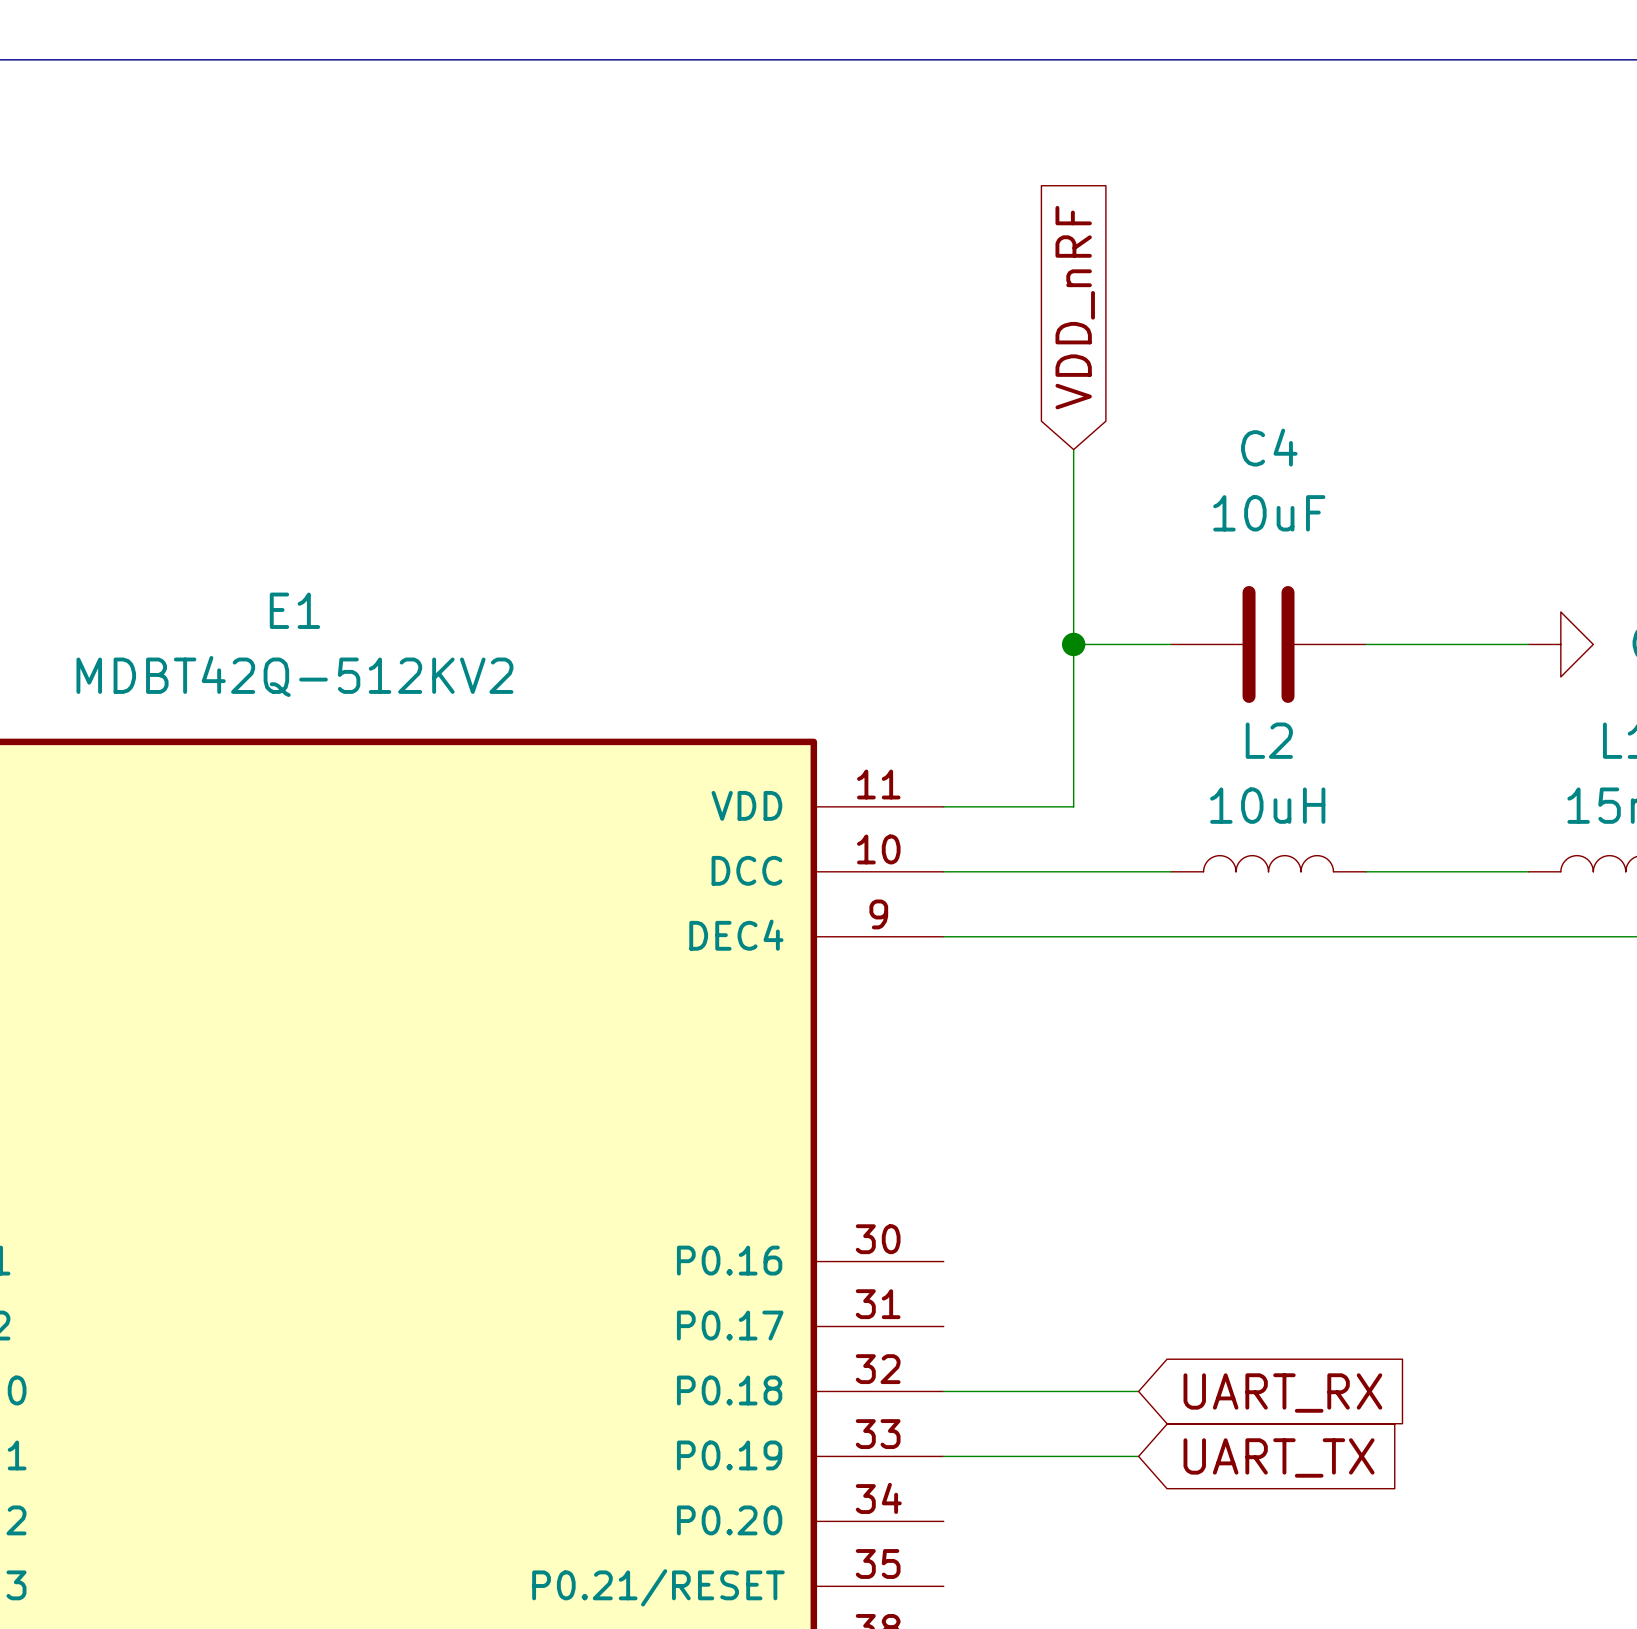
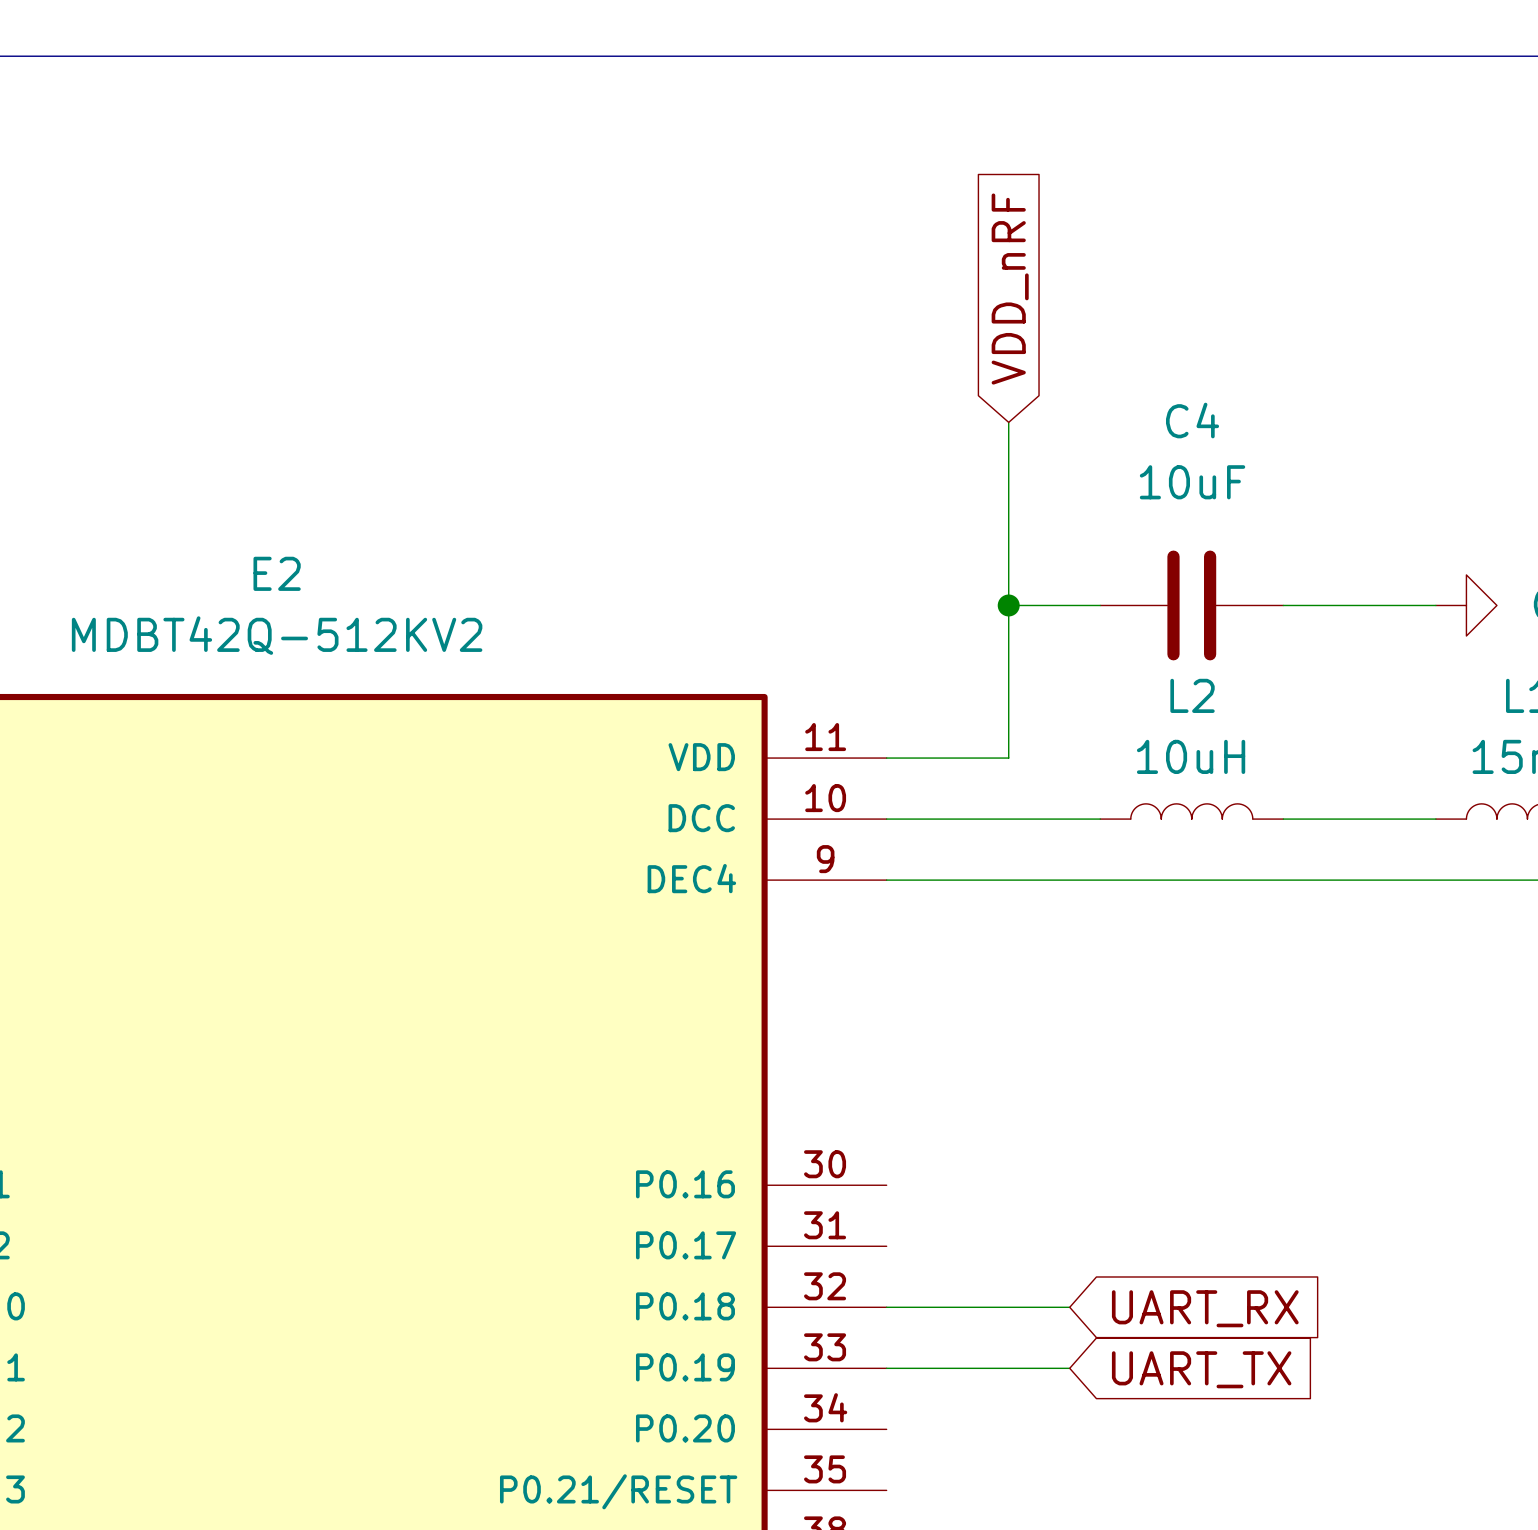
E1 name: E1 (294, 610) -> E2 (277, 573)

